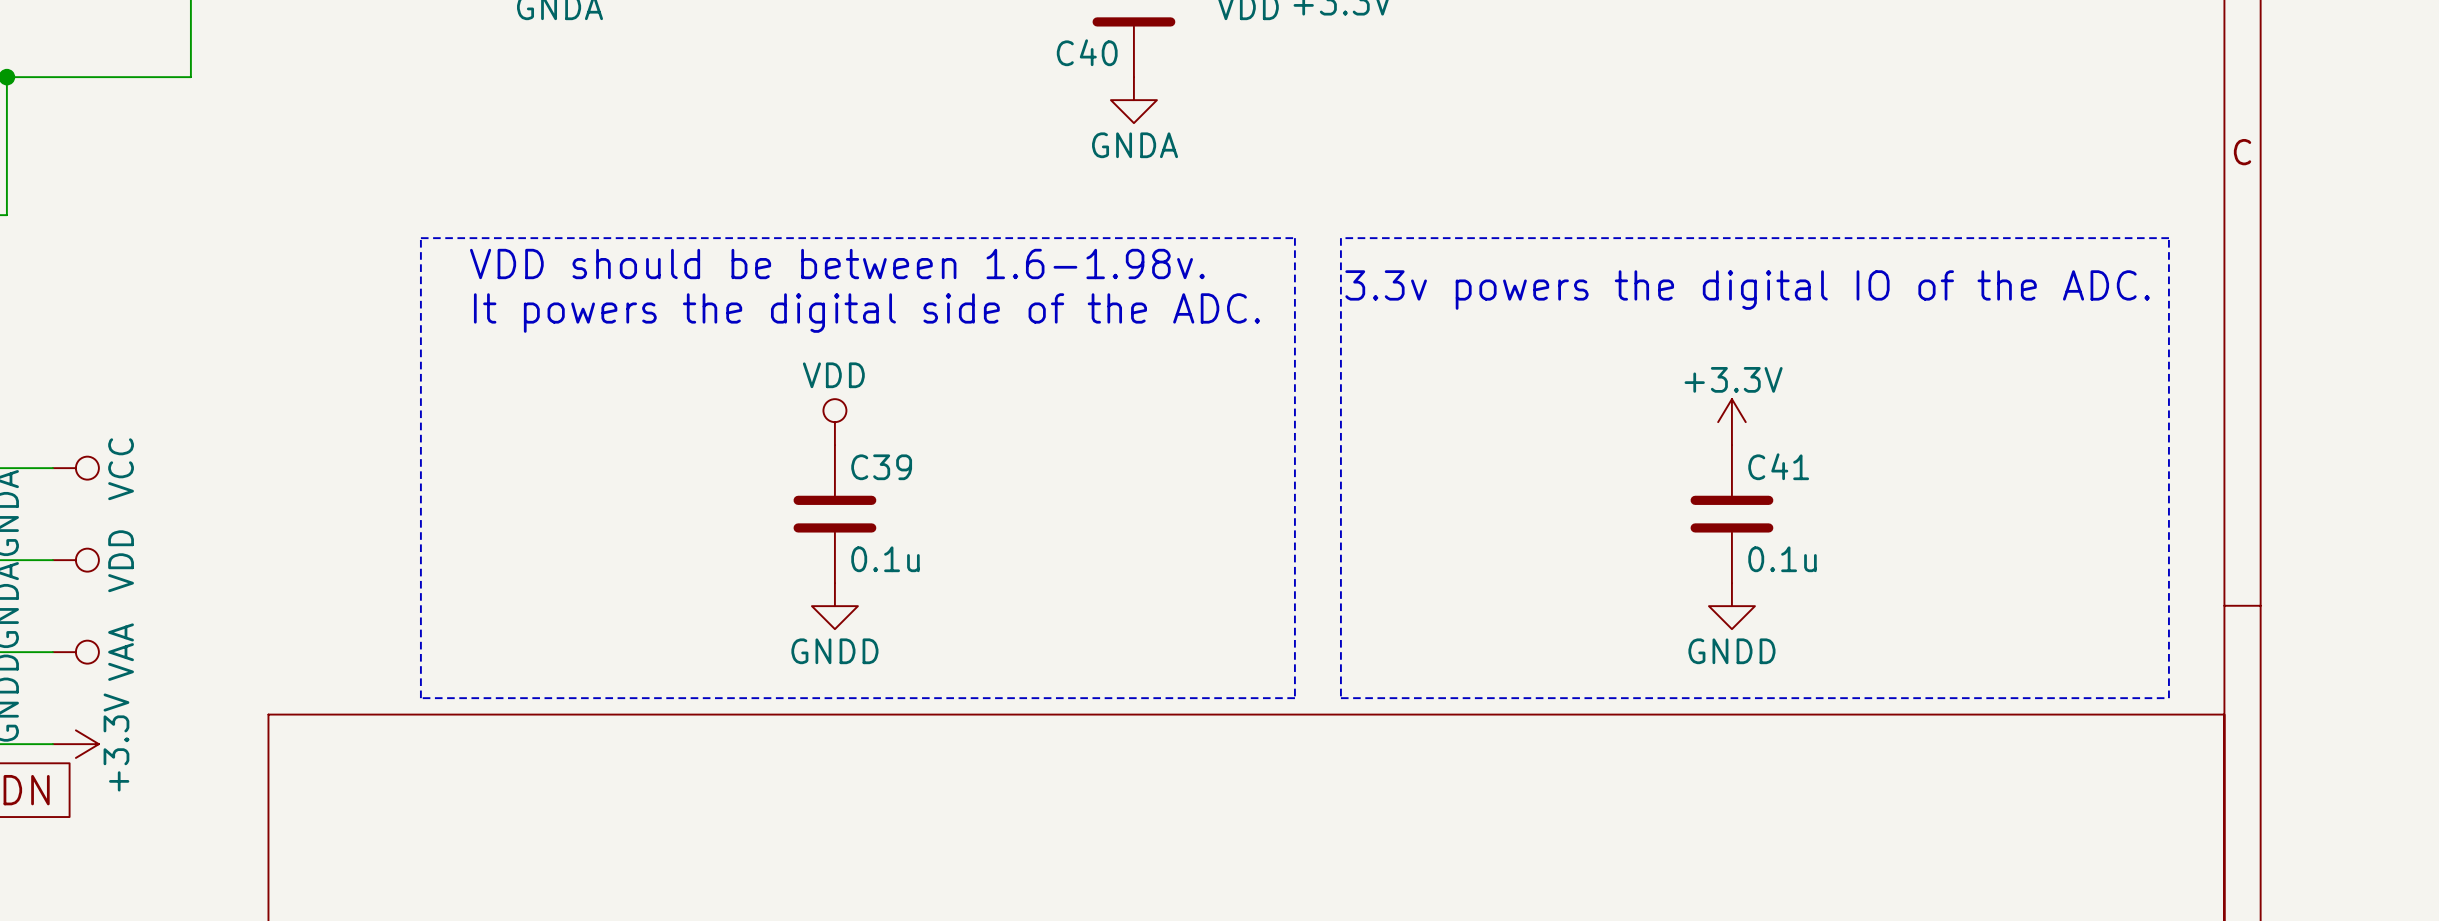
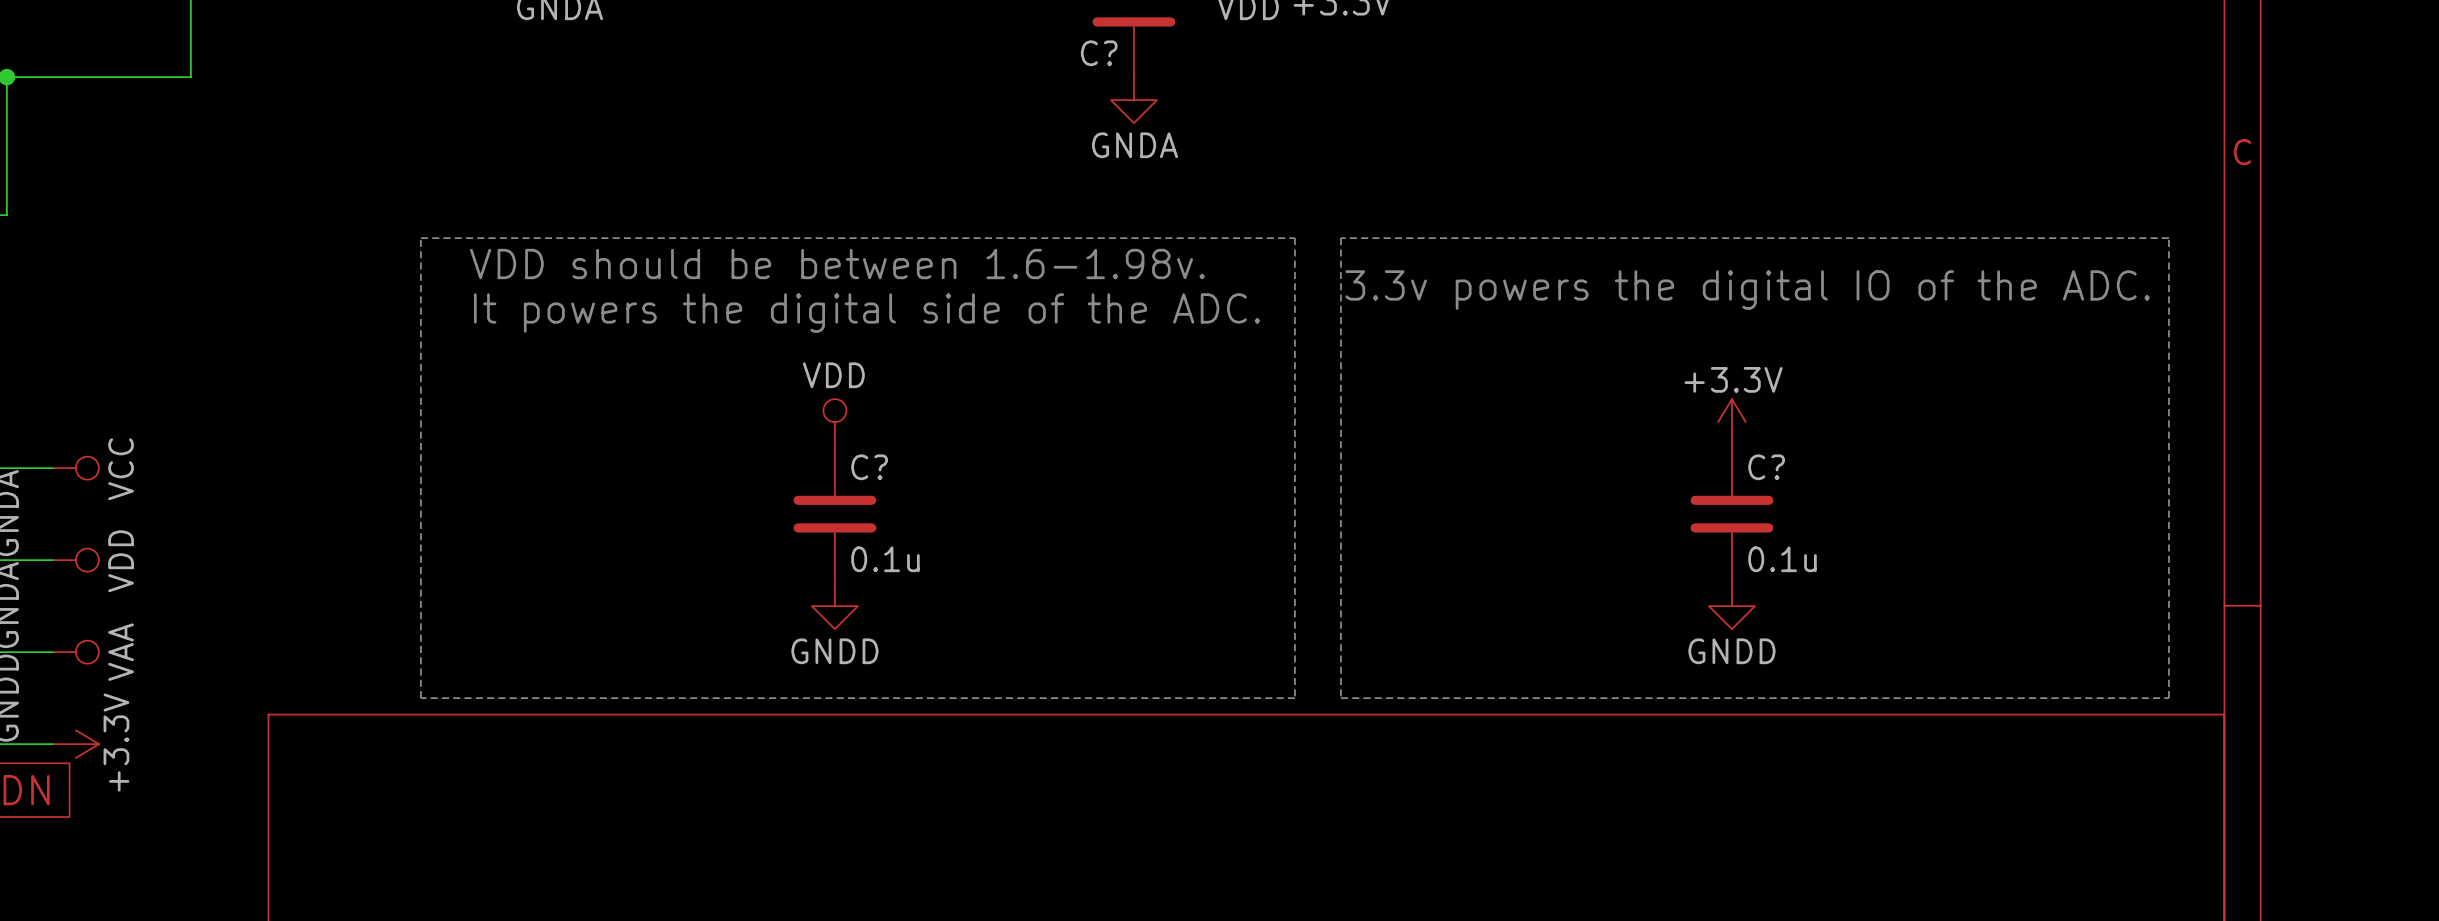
C40 name: C40 (1087, 52) -> C? (1099, 53)
C41 name: C41 (1778, 466) -> C? (1766, 467)
C39 name: C39 (881, 467) -> C? (869, 467)

